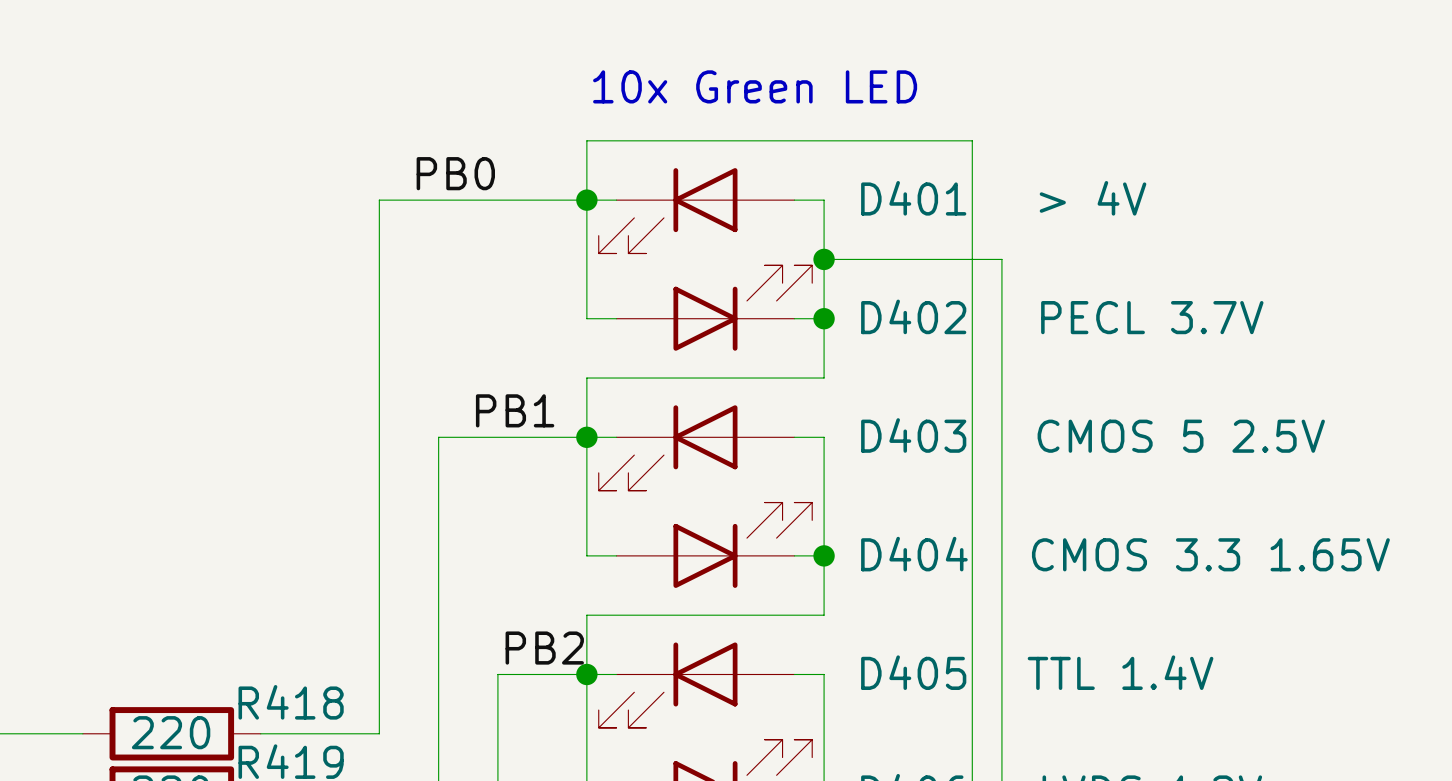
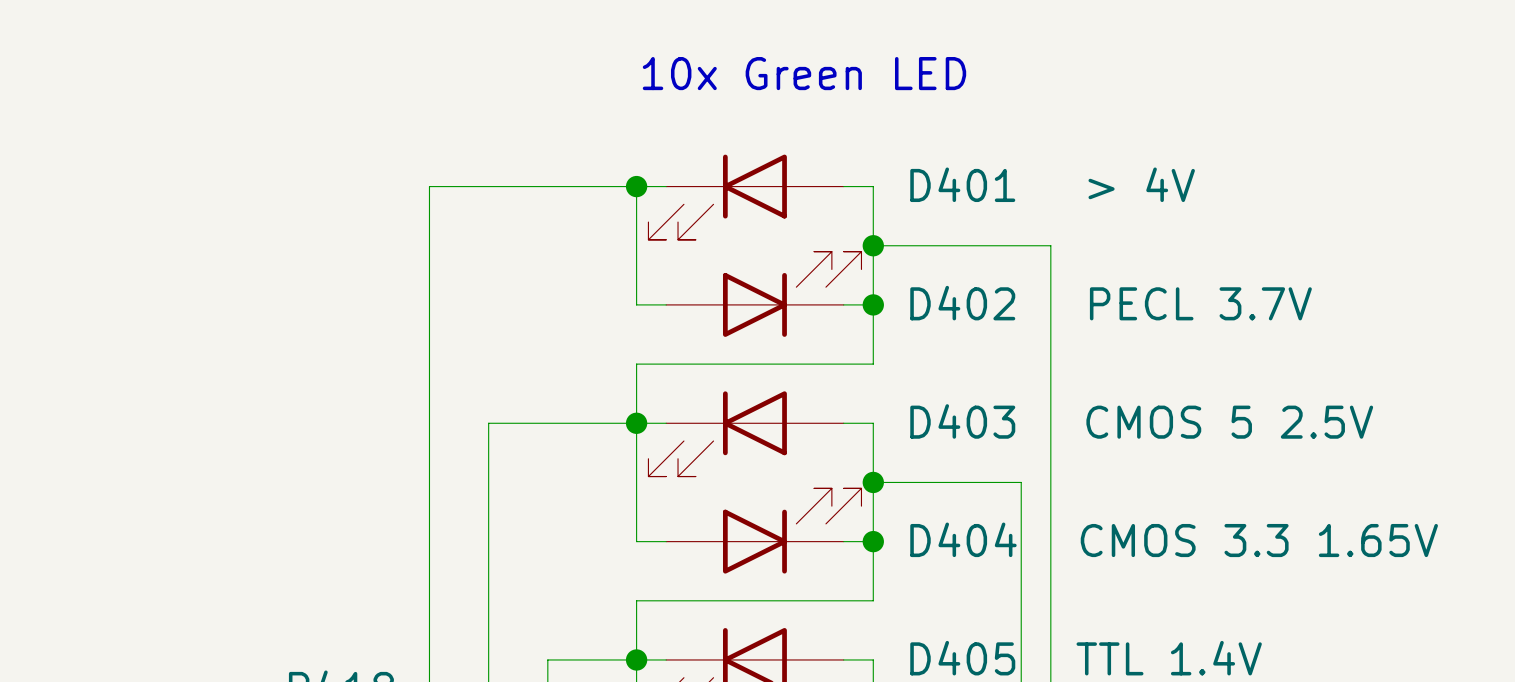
label: PB0 (455, 173) -> none
wire: (586, 200) (586, 140) (972, 140) (972, 496) -> (873, 482) (1021, 482)
label: PB1 (515, 410) -> none
junction: none -> (873, 482)
label: PB2 (544, 648) -> none

